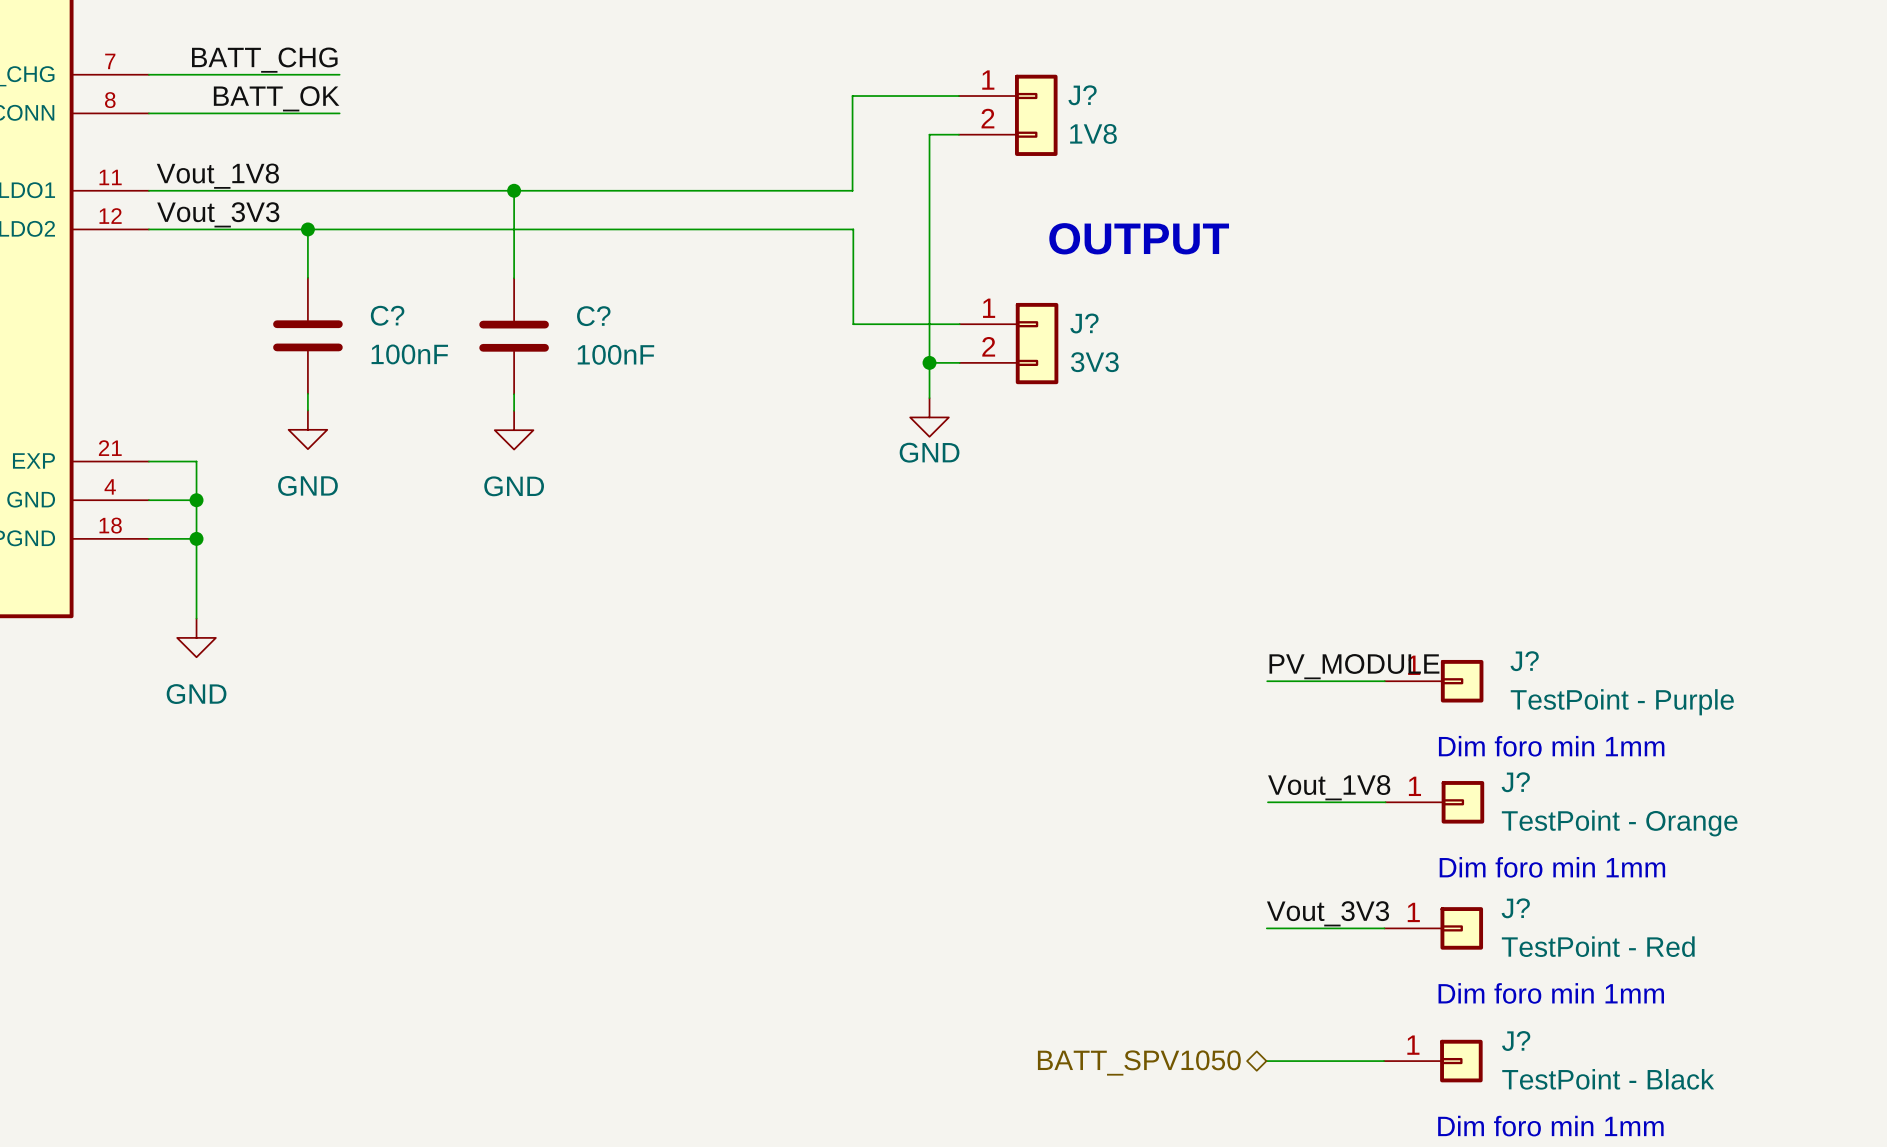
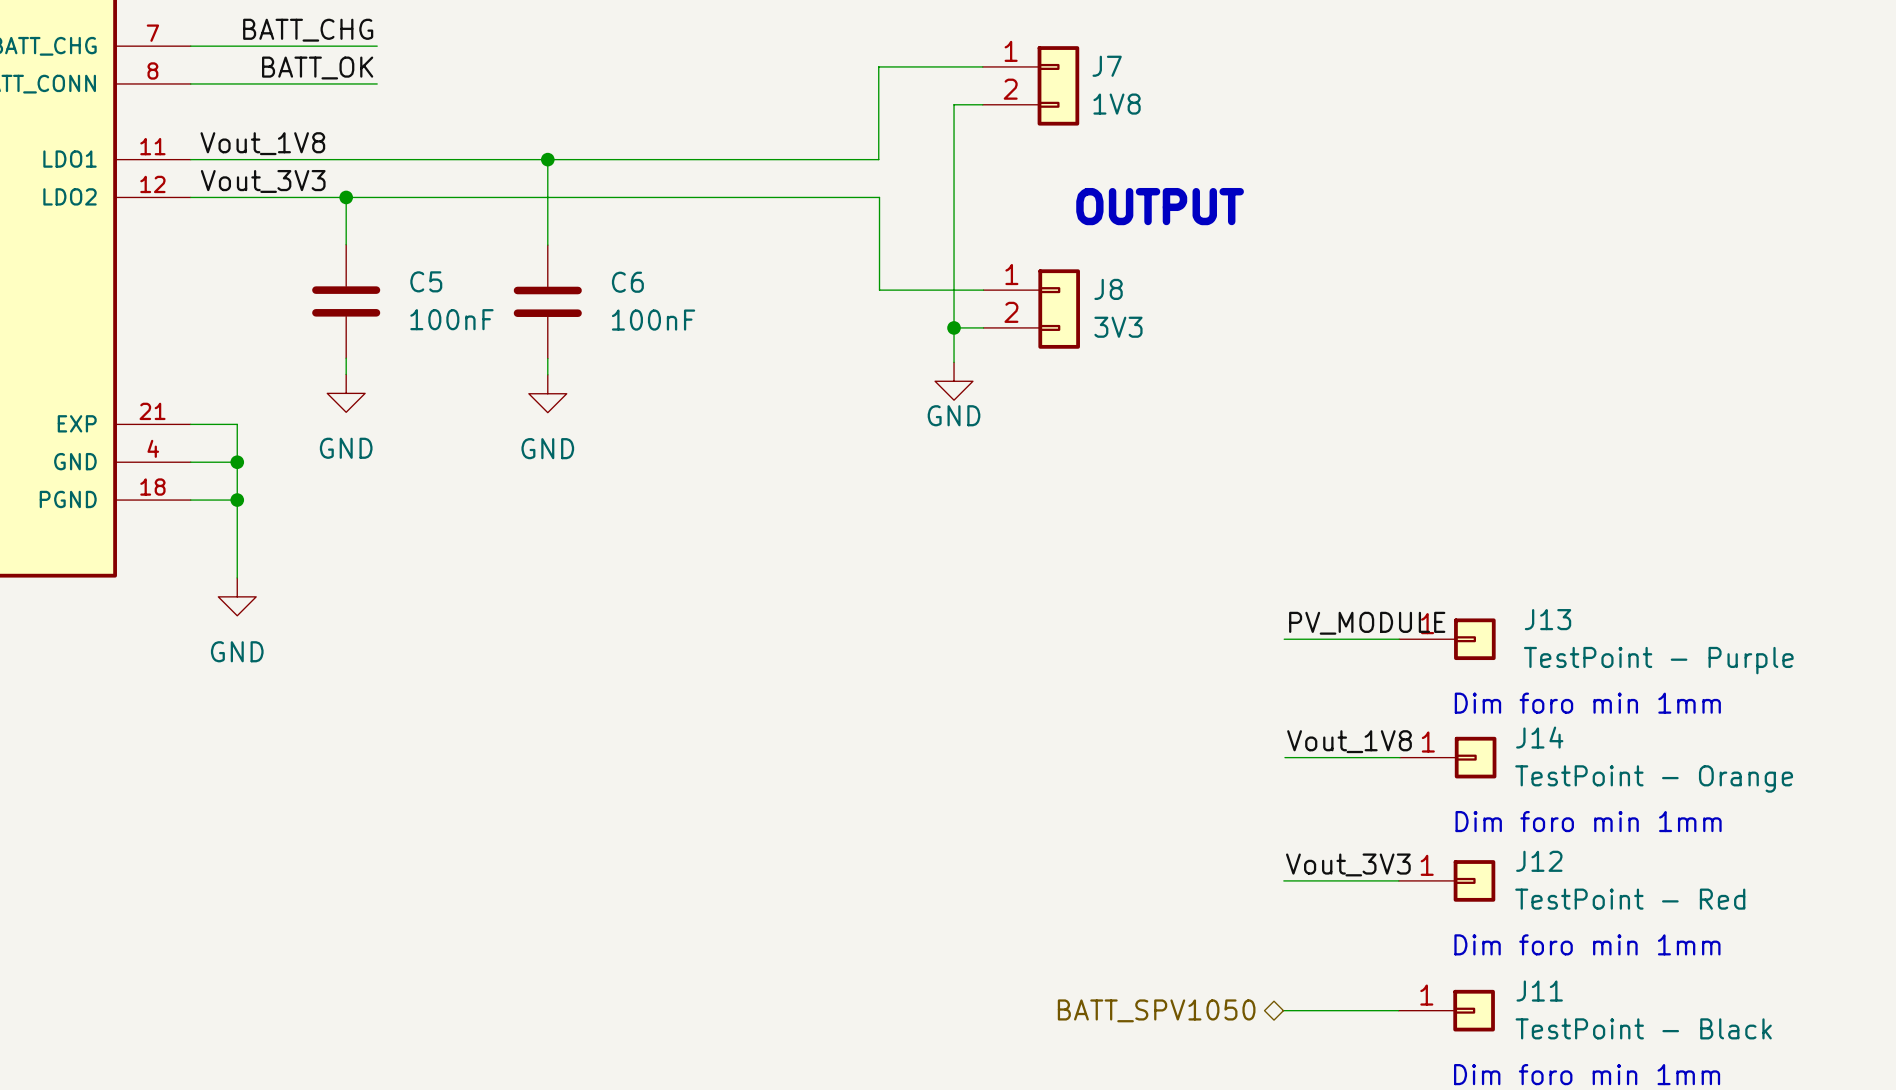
J? name: J? (1082, 95) -> J7 (1107, 66)
C? name: C? (387, 315) -> C5 (426, 281)
C? name: C? (593, 316) -> C6 (627, 282)
J? name: J? (1084, 323) -> J8 (1108, 289)
J? name: J? (1524, 661) -> J13 (1548, 619)
J? name: J? (1515, 782) -> J14 (1539, 737)
J? name: J? (1515, 908) -> J12 (1539, 861)
J? name: J? (1516, 1041) -> J11 (1539, 991)

